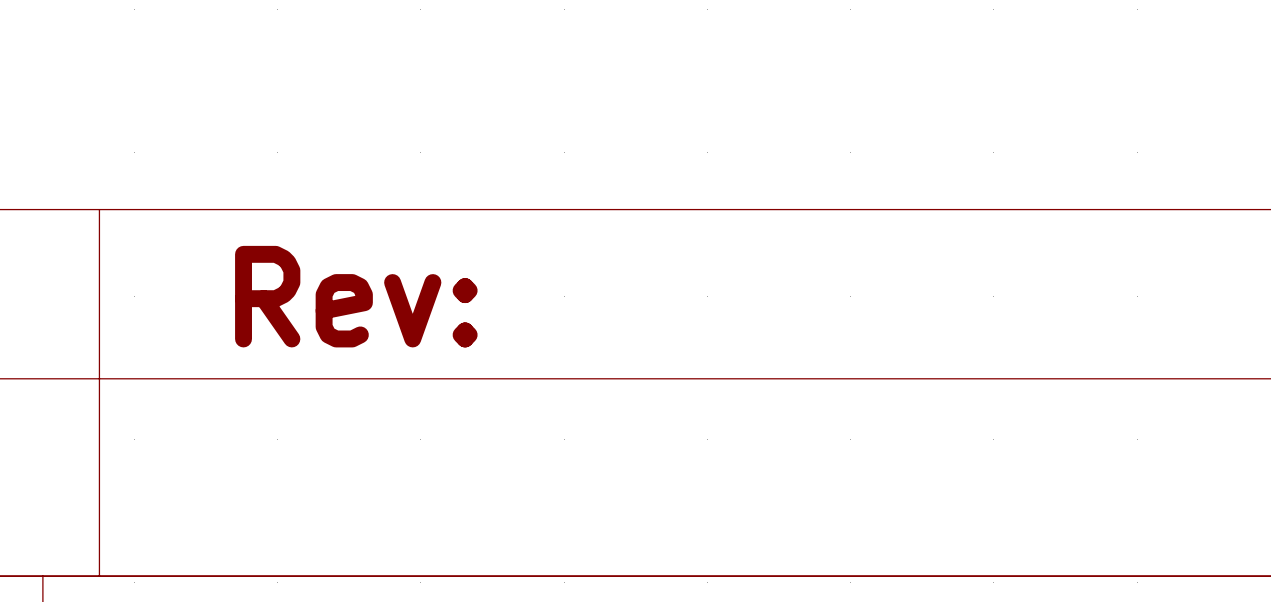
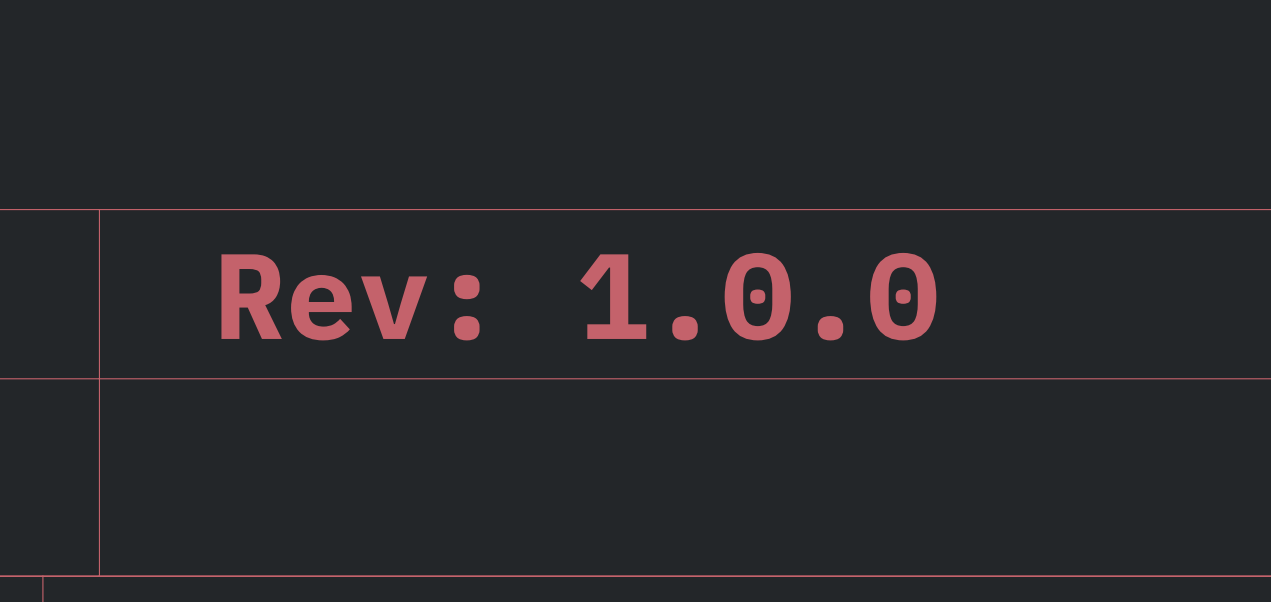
title block: Rev: (356, 296) -> Rev: 1.0.0 (578, 296)

